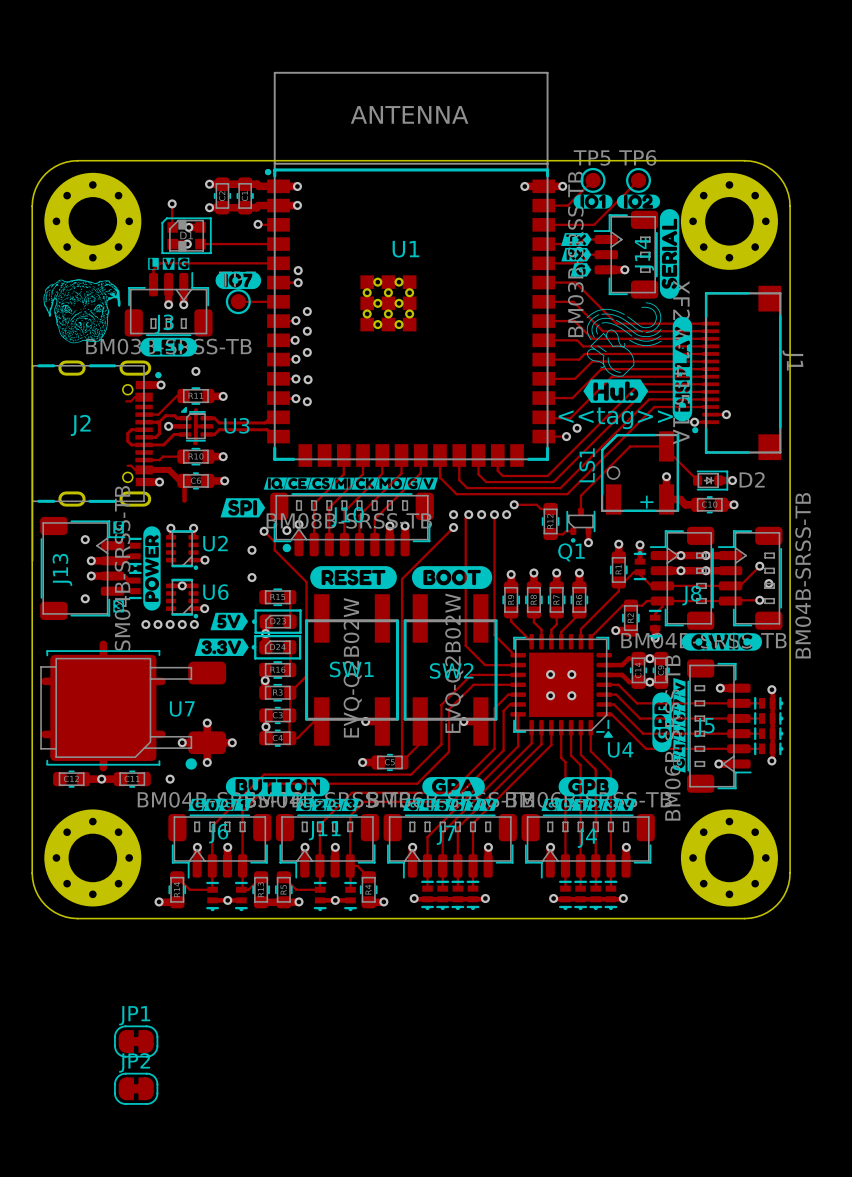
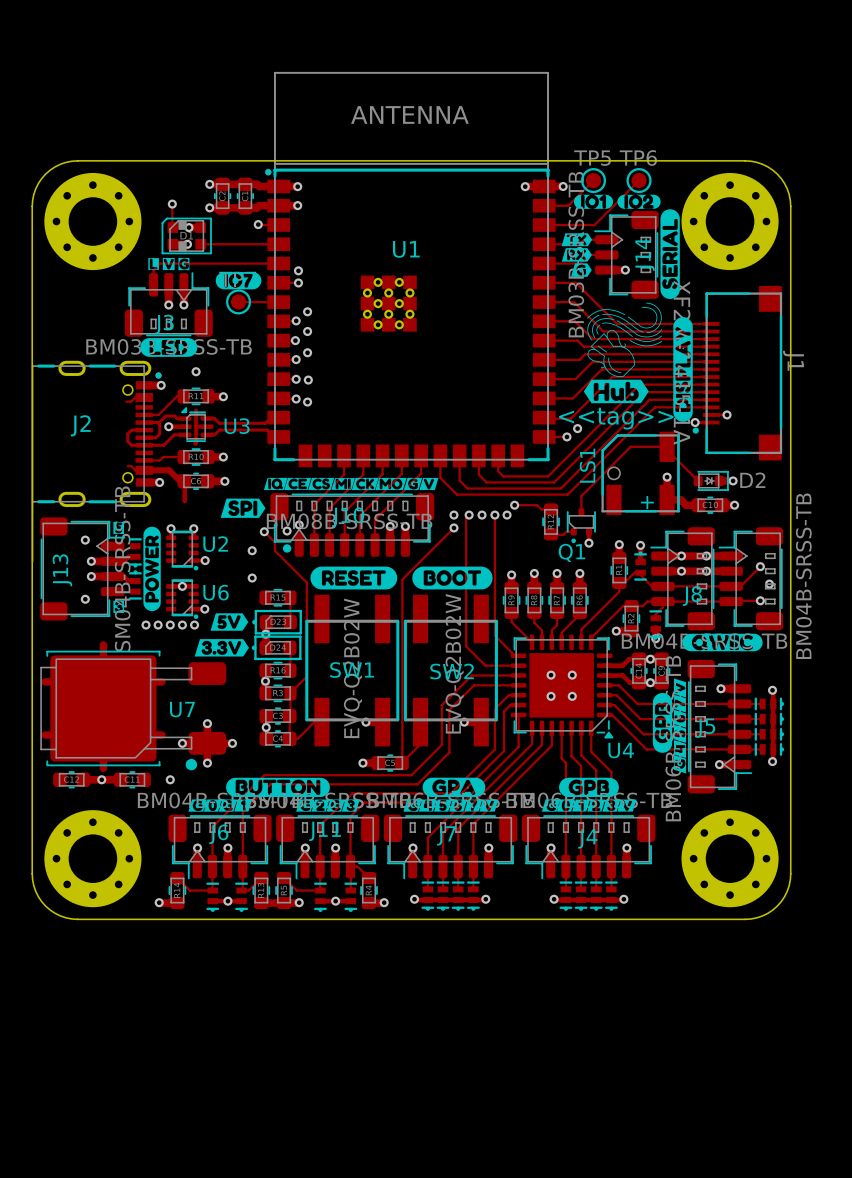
drawing: [43, 279, 121, 344] -> none
JP1: (136, 1041) -> none
JP2: (136, 1088) -> none

